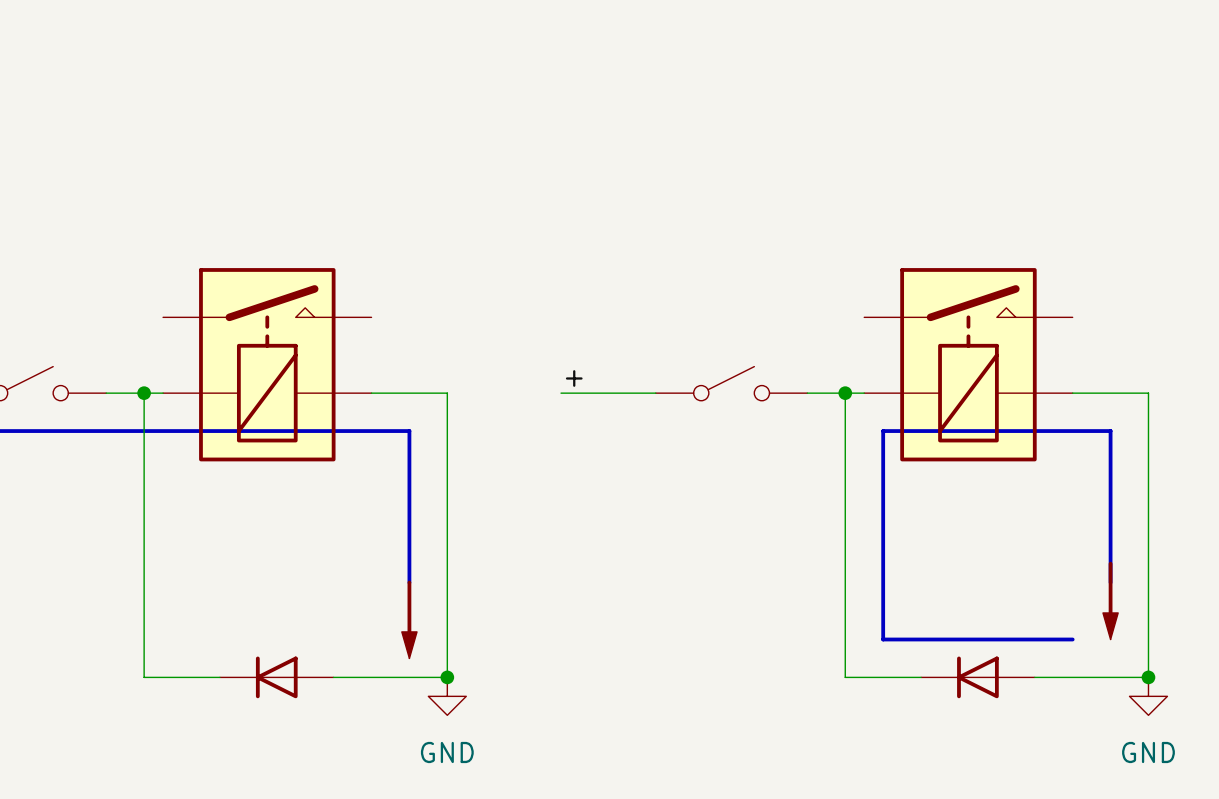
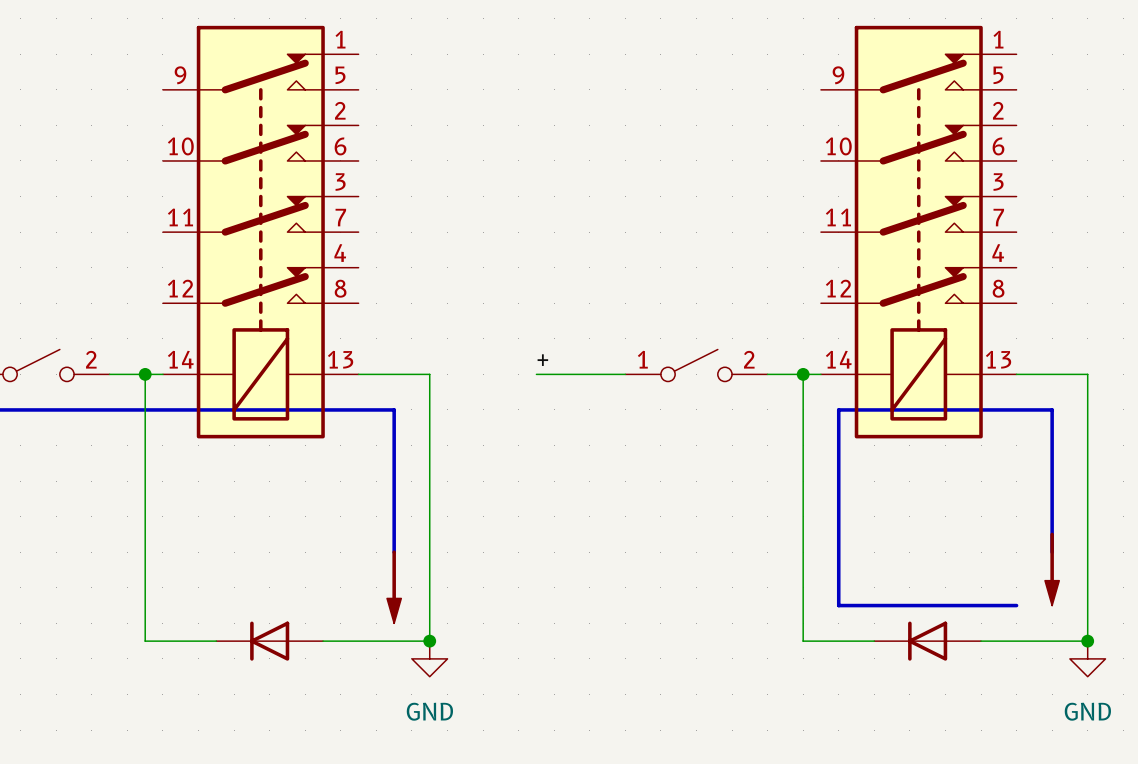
part: none -> (260, 232)
part: none -> (918, 232)
part: (267, 364) -> none
part: (968, 364) -> none
part pin number: none -> 2 (91, 359)
part pin number: none -> 1 (642, 359)
part pin number: none -> 2 (749, 359)

